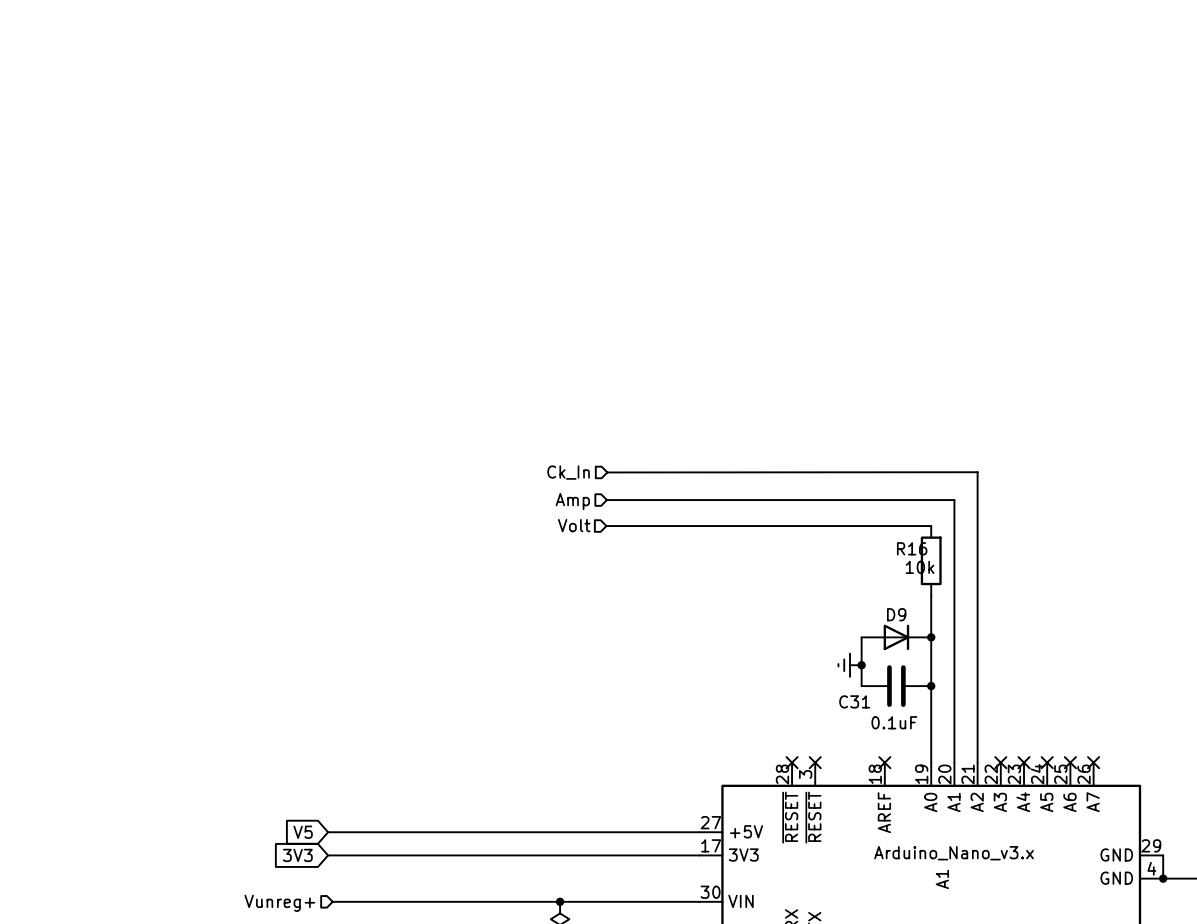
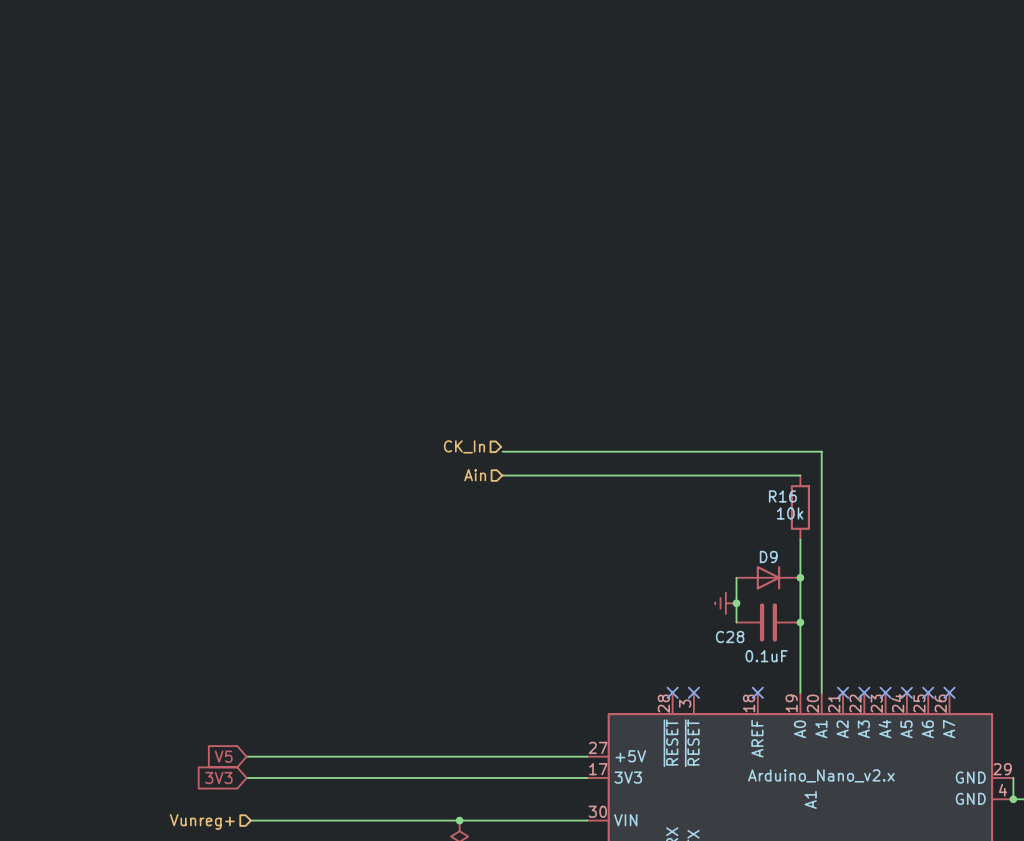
hierarchical label: Ck_In (568, 472) -> none
wire: (607, 472) (977, 472) (977, 762) -> none
hierarchical label: Amp (572, 501) -> CK_In (464, 446)
hierarchical label: Volt (574, 525) -> Ain (475, 475)
C31 name: C31 (854, 701) -> C28 (730, 637)
no-connect mark: none -> (843, 692)
A1 value: Arduino_Nano_v3.x (954, 853) -> Arduino_Nano_v2.x (821, 775)

